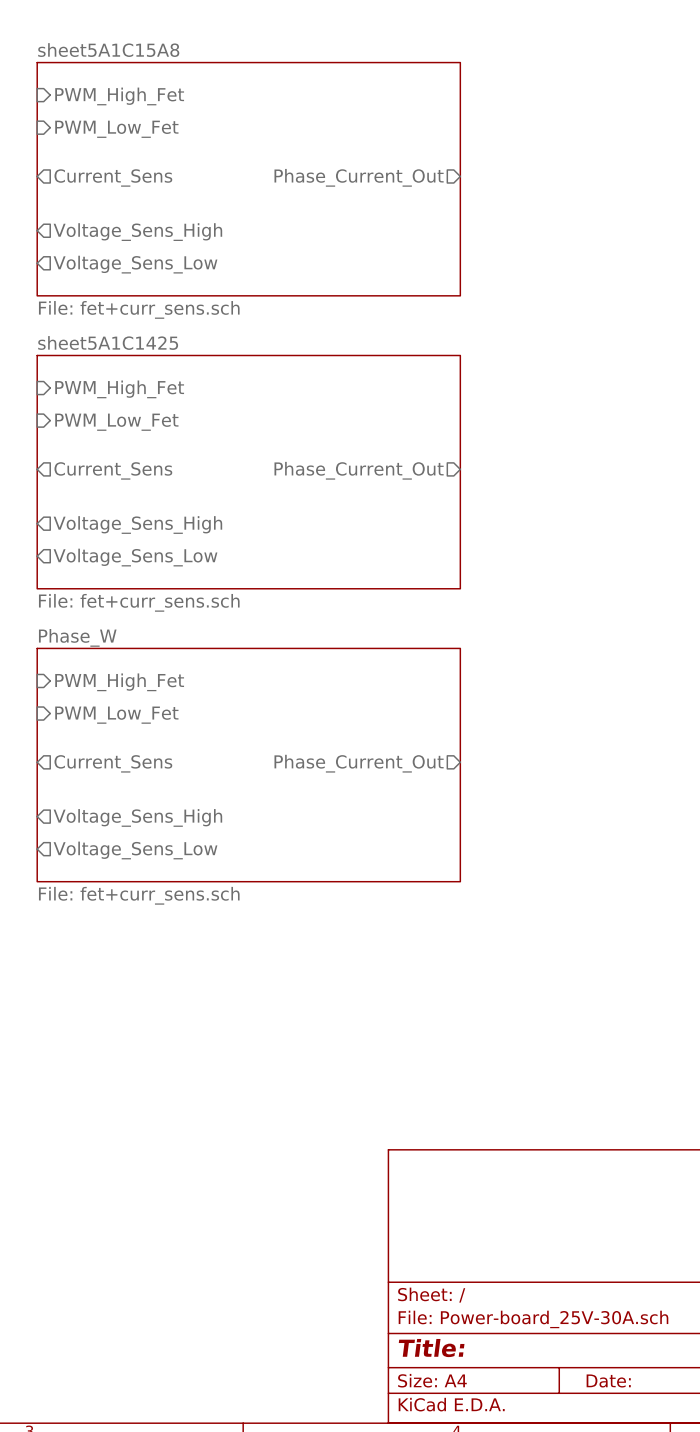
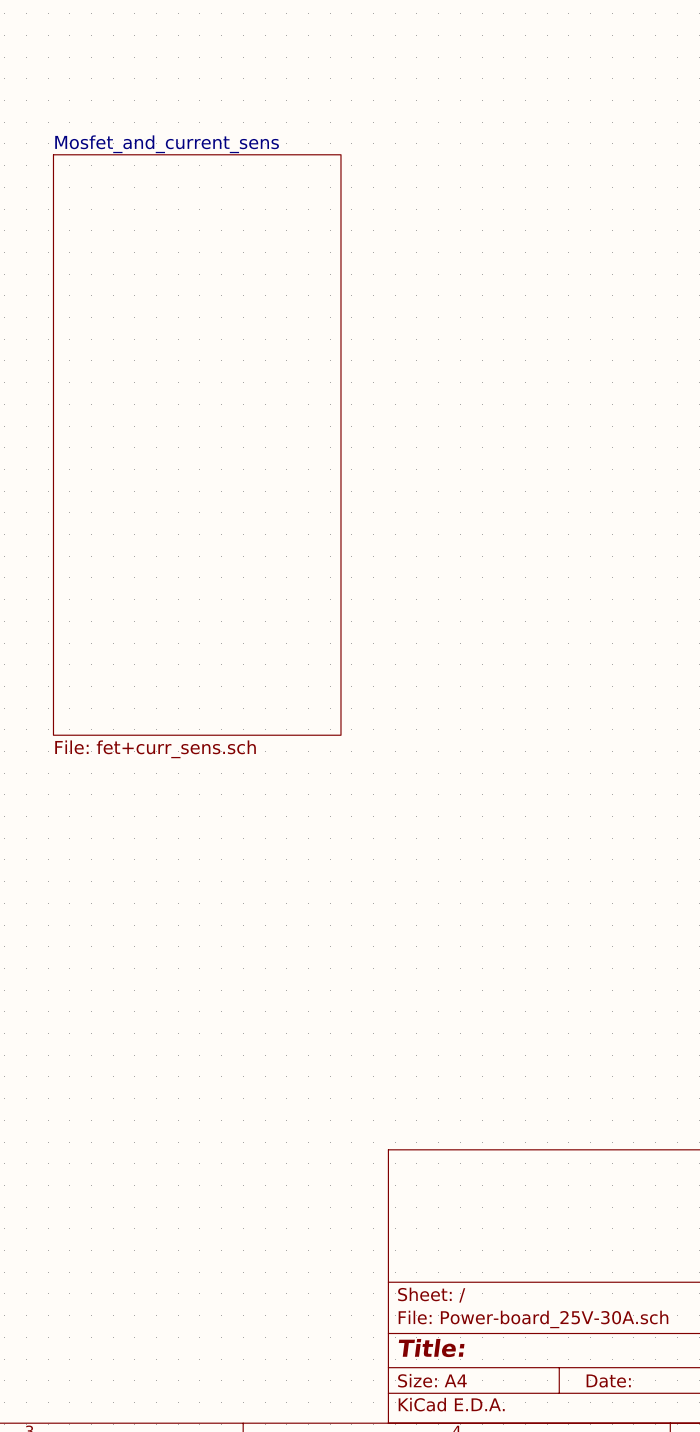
sheet pin: PWM_High_Fet (119, 96) -> none
sheet pin: PWM_Low_Fet (116, 129) -> none
sheet pin: Current_Sens (113, 177) -> none
sheet pin: Phase_Current_Out (359, 177) -> none
sheet sheet5A1C15A8: File: fet+curr_sens.sch (248, 179) -> none
sheet pin: Voltage_Sens_High (137, 232) -> none
sheet pin: Voltage_Sens_Low (135, 264) -> none
sheet pin: PWM_High_Fet (119, 389) -> none
sheet pin: PWM_Low_Fet (116, 422) -> none
sheet Mosfet_and_current_sens: none -> File: fet+curr_sens.sch (197, 445)
sheet pin: Current_Sens (113, 470) -> none
sheet pin: Phase_Current_Out (359, 470) -> none
sheet sheet5A1C1425: File: fet+curr_sens.sch (248, 472) -> none
sheet pin: Voltage_Sens_High (137, 525) -> none
sheet pin: Voltage_Sens_Low (135, 557) -> none
sheet pin: PWM_High_Fet (119, 682) -> none
sheet pin: PWM_Low_Fet (116, 715) -> none
sheet pin: Current_Sens (113, 763) -> none
sheet pin: Phase_Current_Out (359, 763) -> none
sheet Phase_W: File: fet+curr_sens.sch (248, 765) -> none
sheet pin: Voltage_Sens_High (137, 817) -> none
sheet pin: Voltage_Sens_Low (135, 850) -> none

